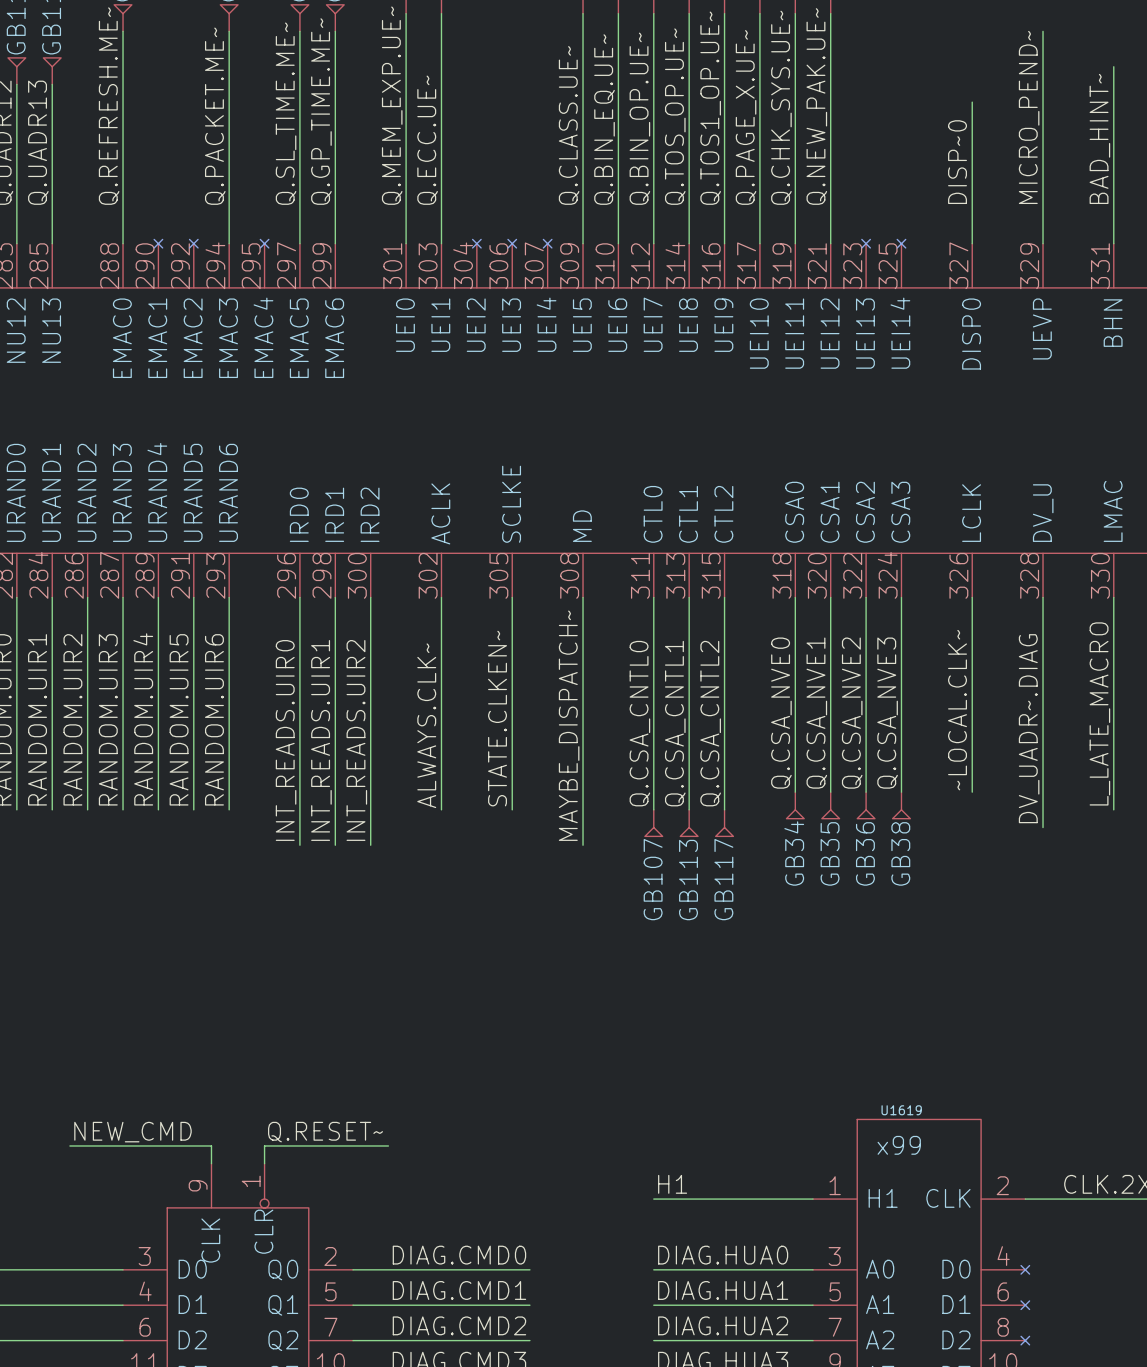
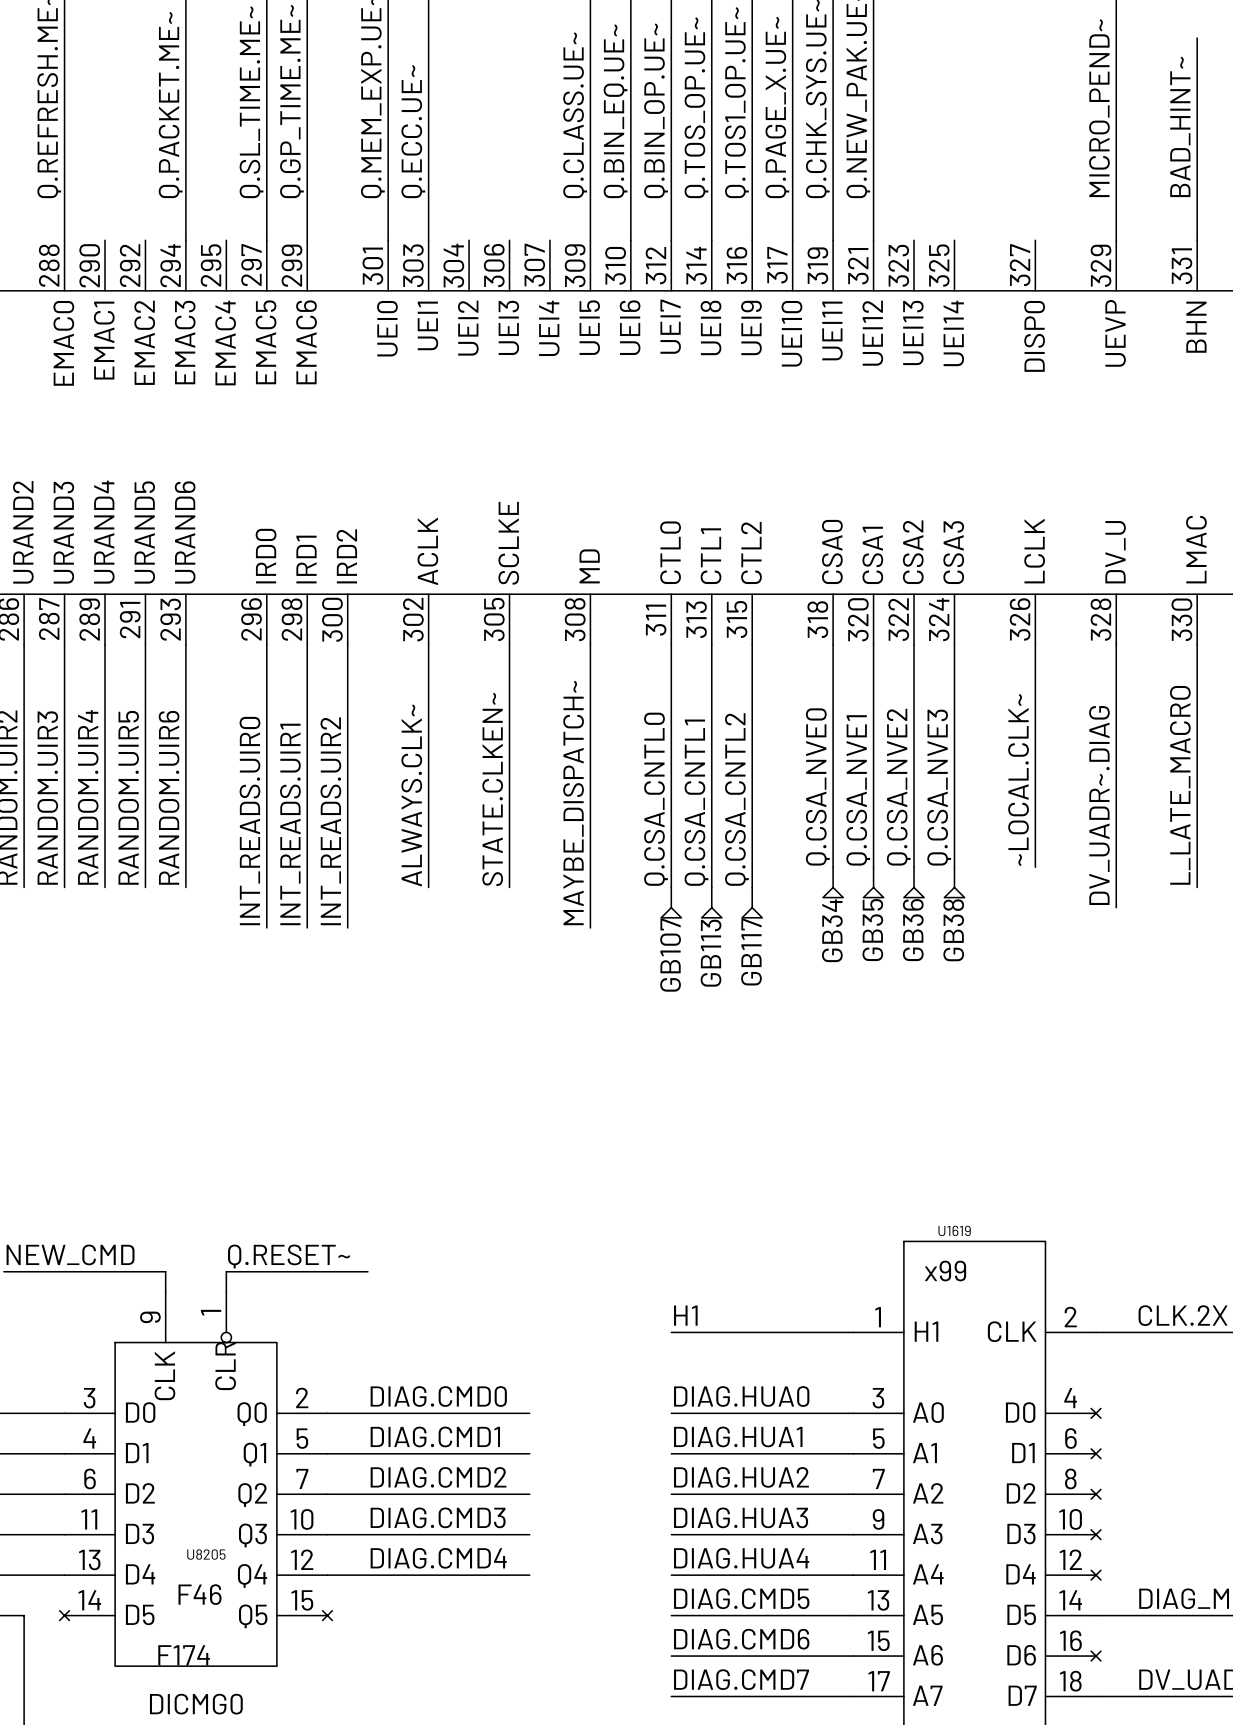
wire: (972, 102) (972, 243) -> none
label: DISP~0 (957, 162) -> none
no-connect mark: (158, 243) -> none
no-connect mark: (193, 243) -> none
no-connect mark: (264, 243) -> none
no-connect mark: (476, 243) -> none
no-connect mark: (512, 243) -> none
no-connect mark: (547, 243) -> none
no-connect mark: (866, 243) -> none
no-connect mark: (901, 243) -> none

